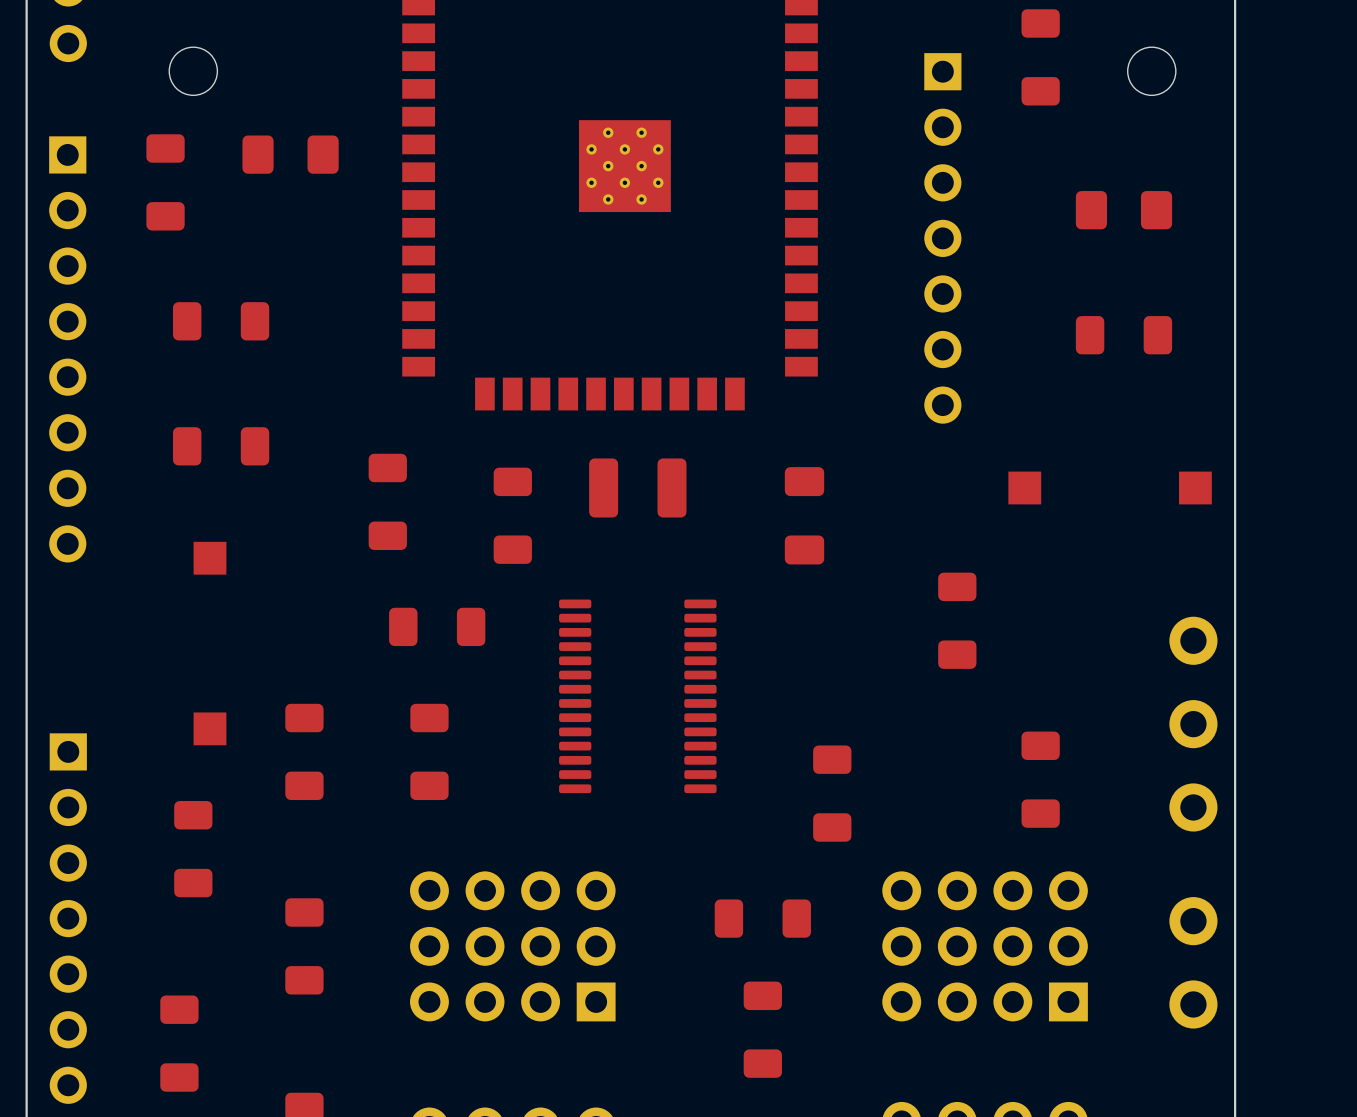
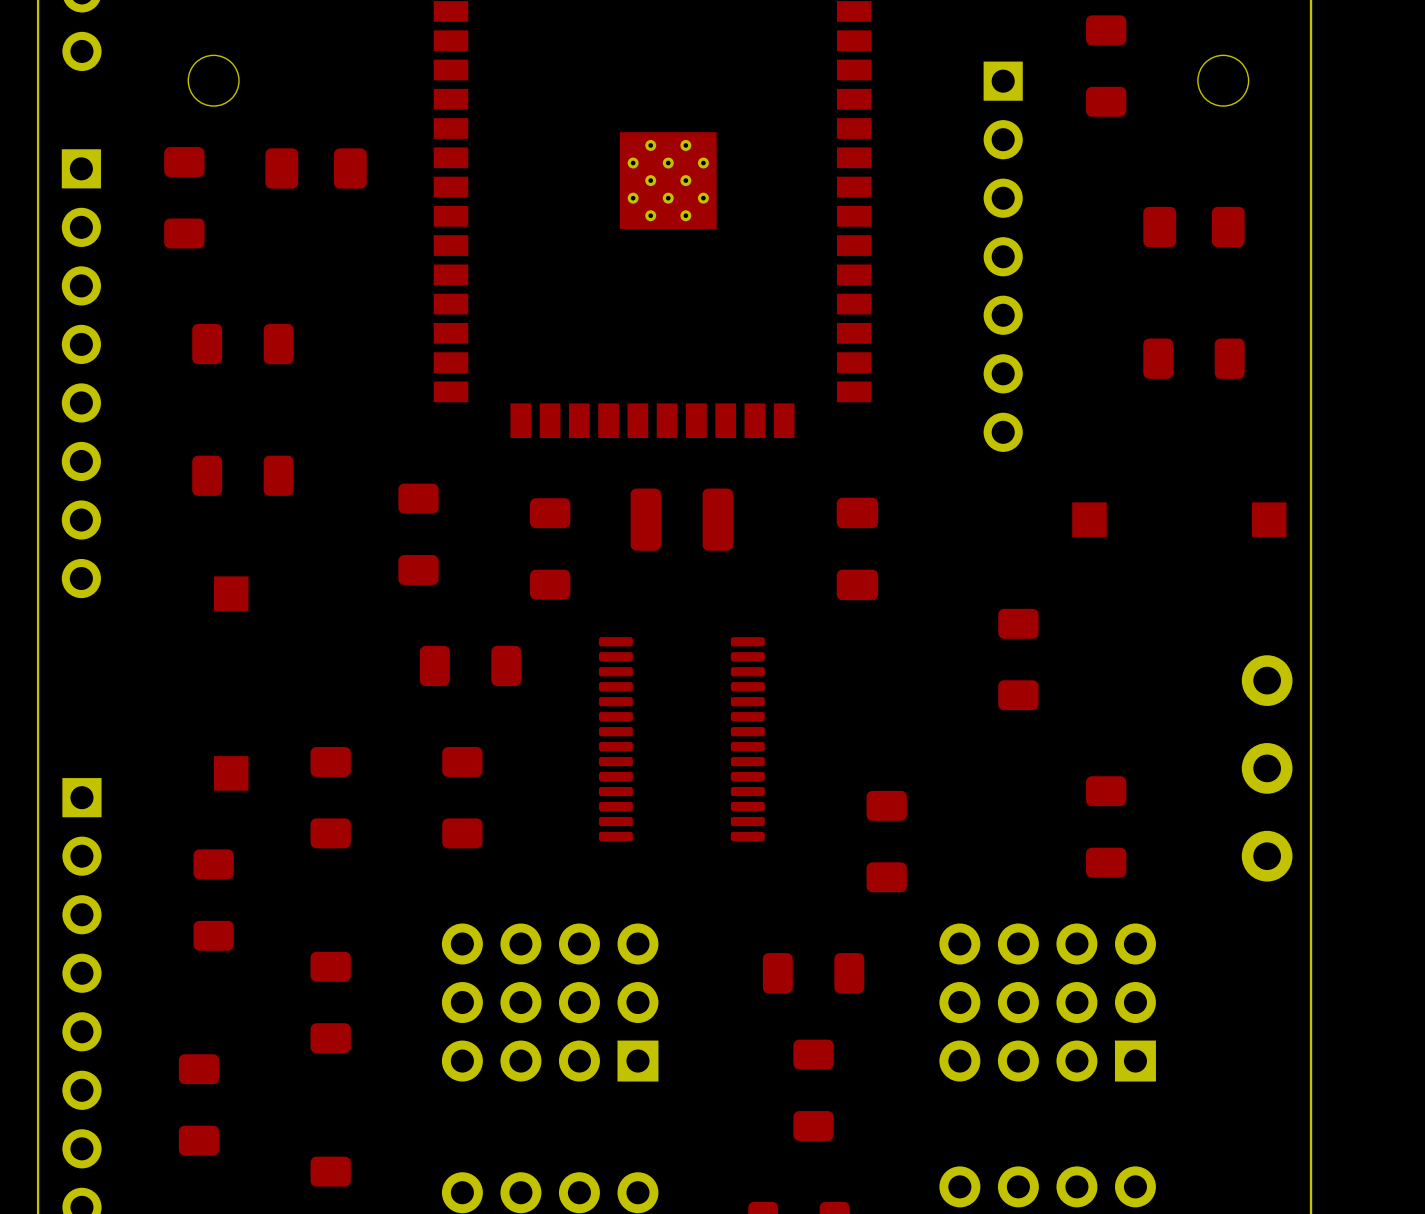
part: (1193, 962) -> none

